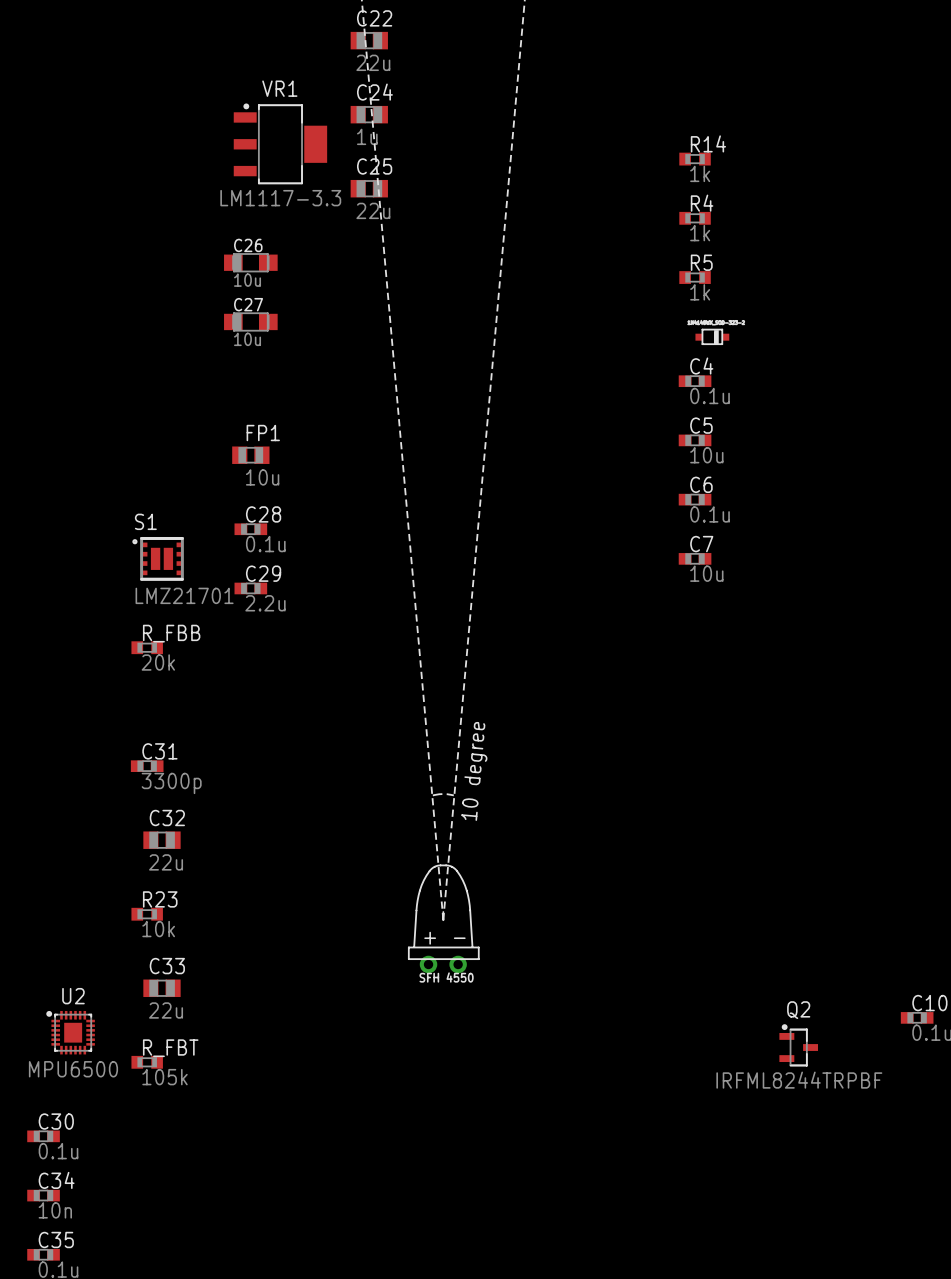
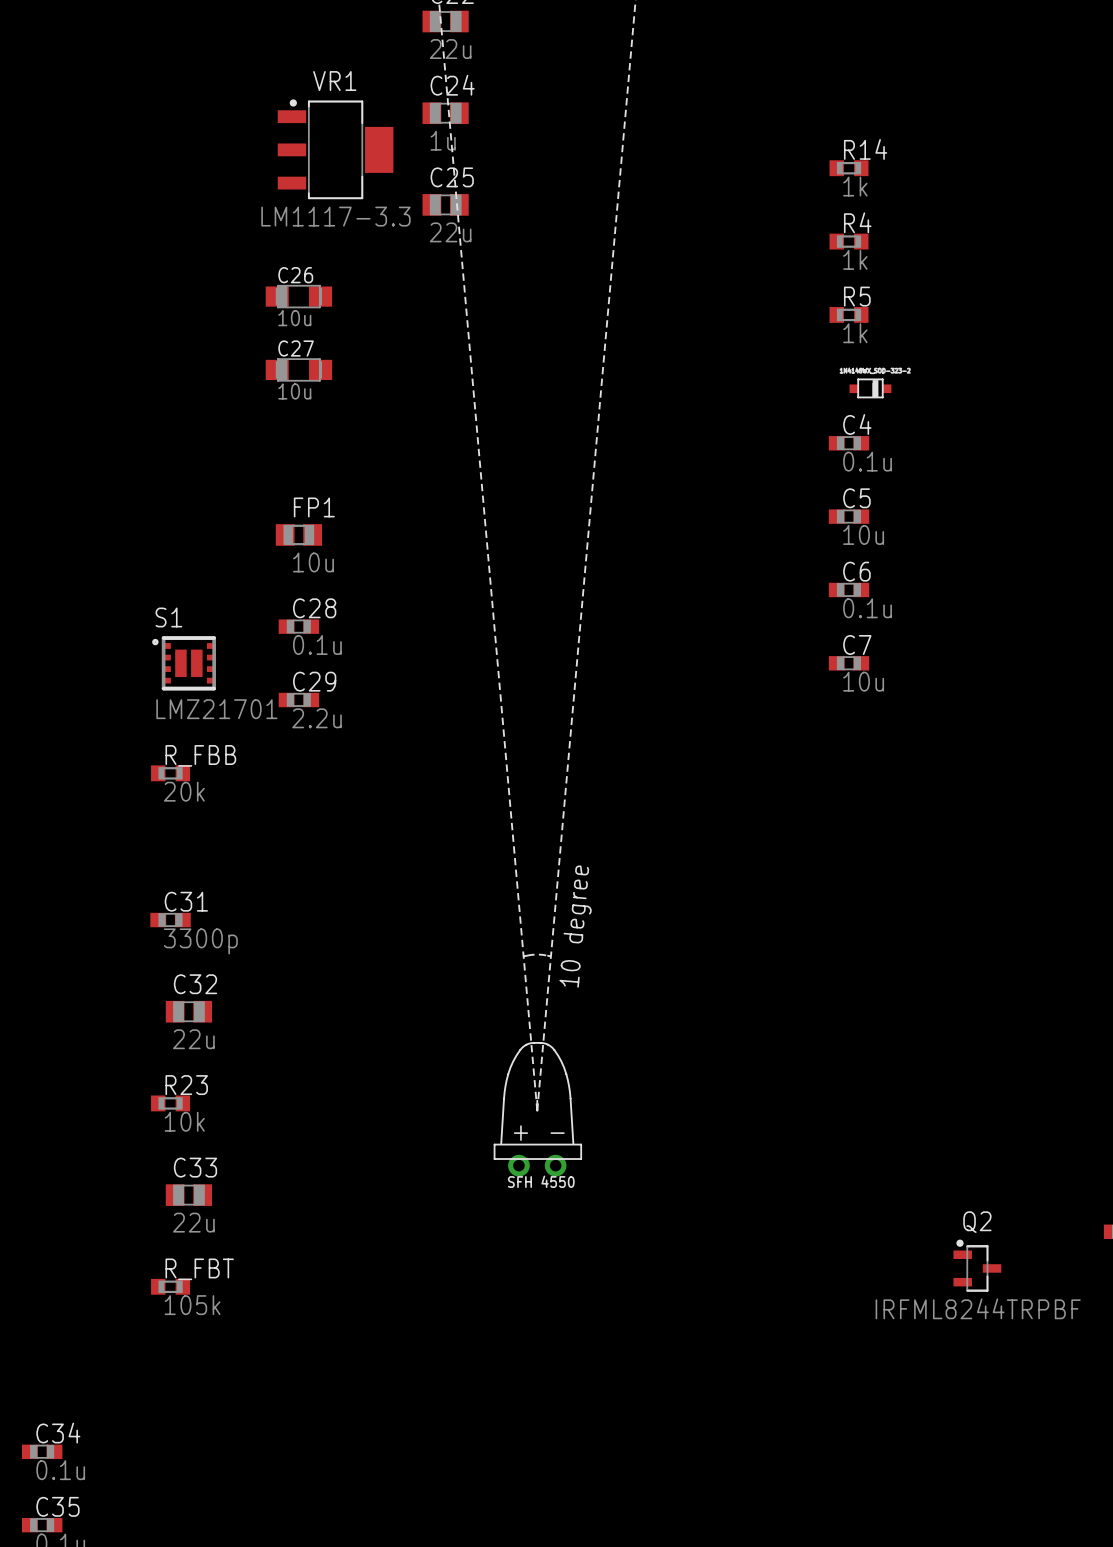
U2: MPU6500 (70, 1032) -> none
C30: 0.1u (43, 1136) -> none
C34 value: 10n (55, 1210) -> 0.1u (60, 1470)

